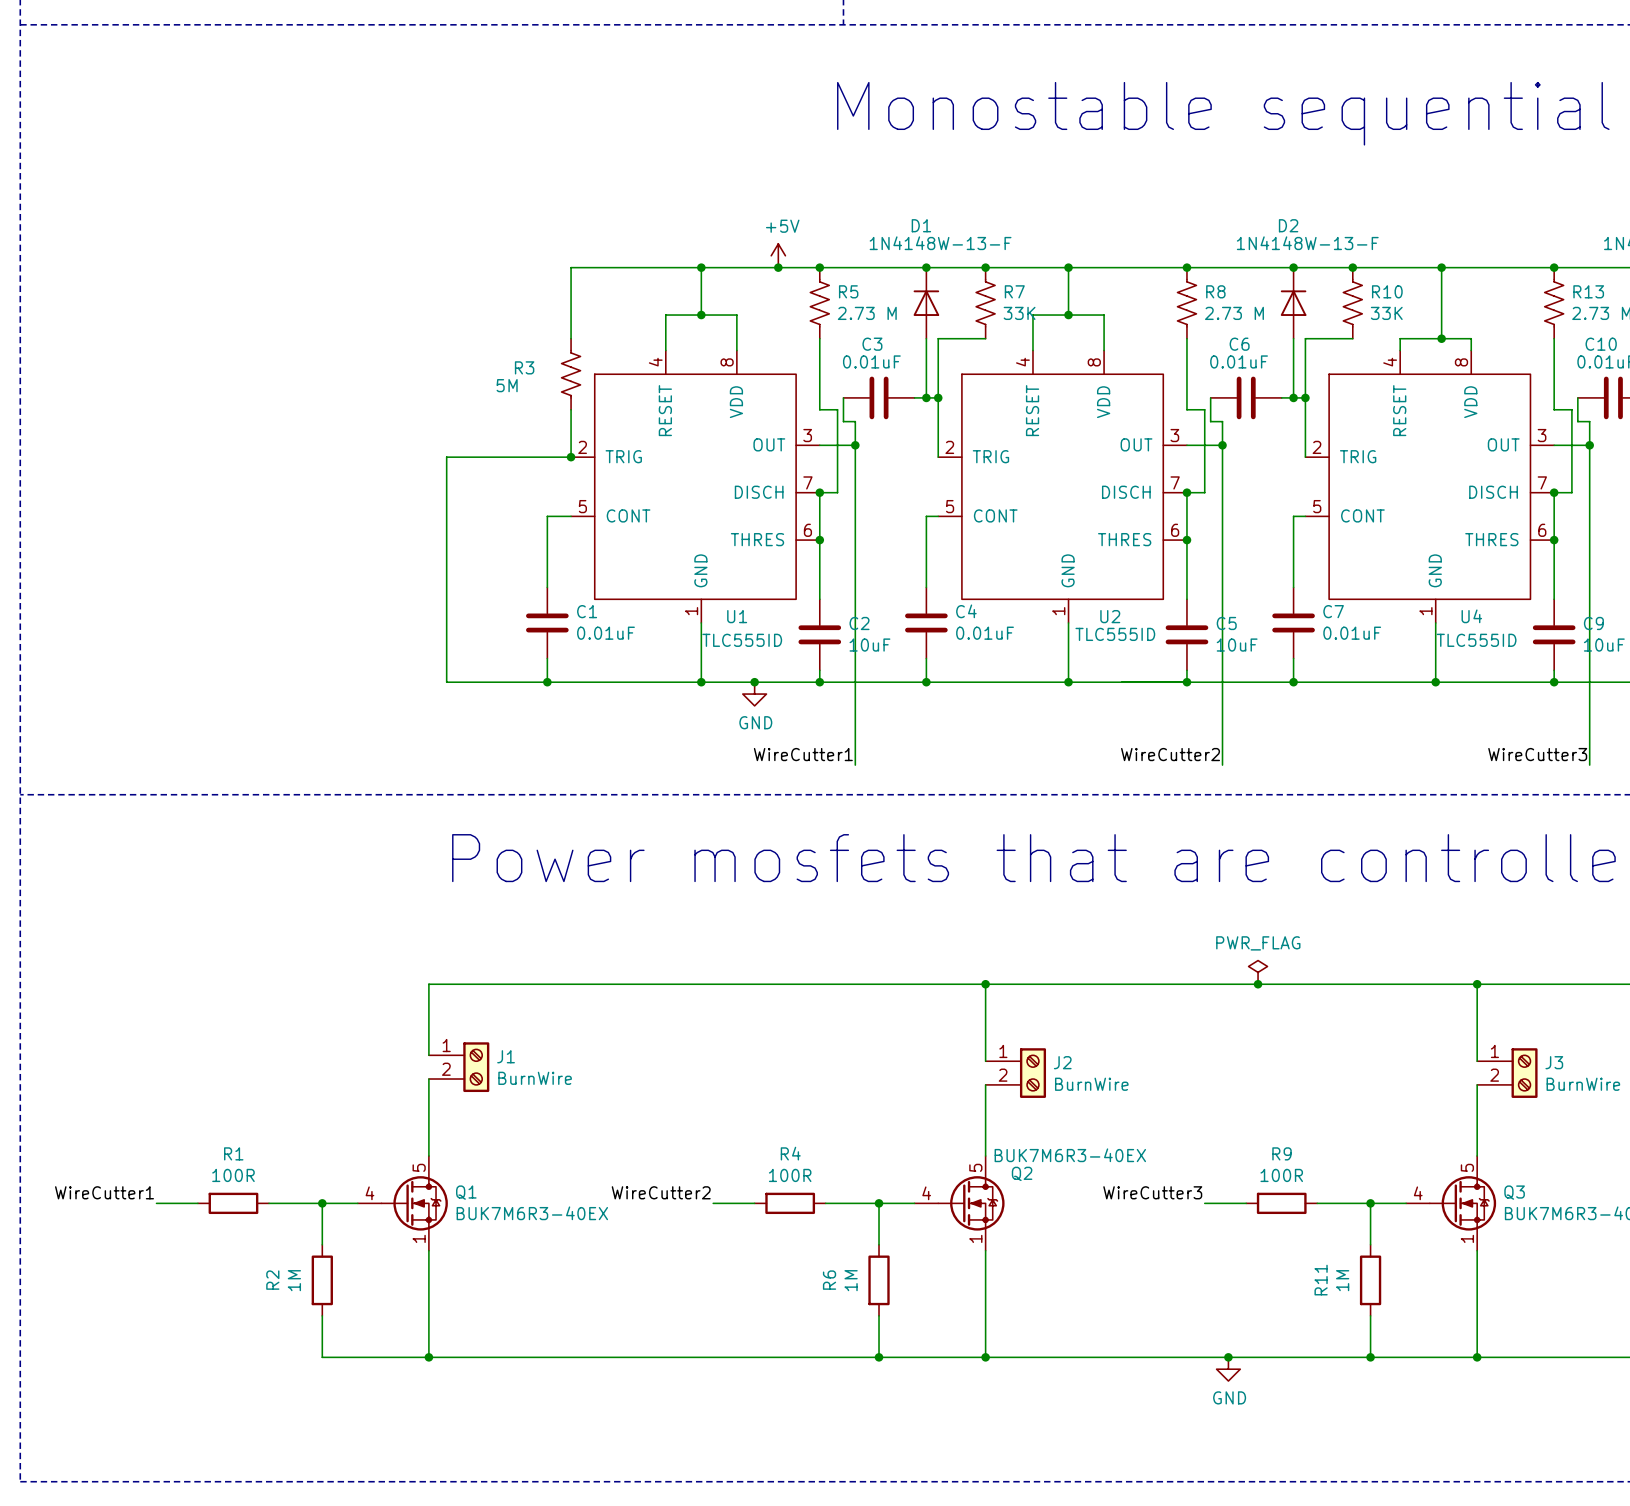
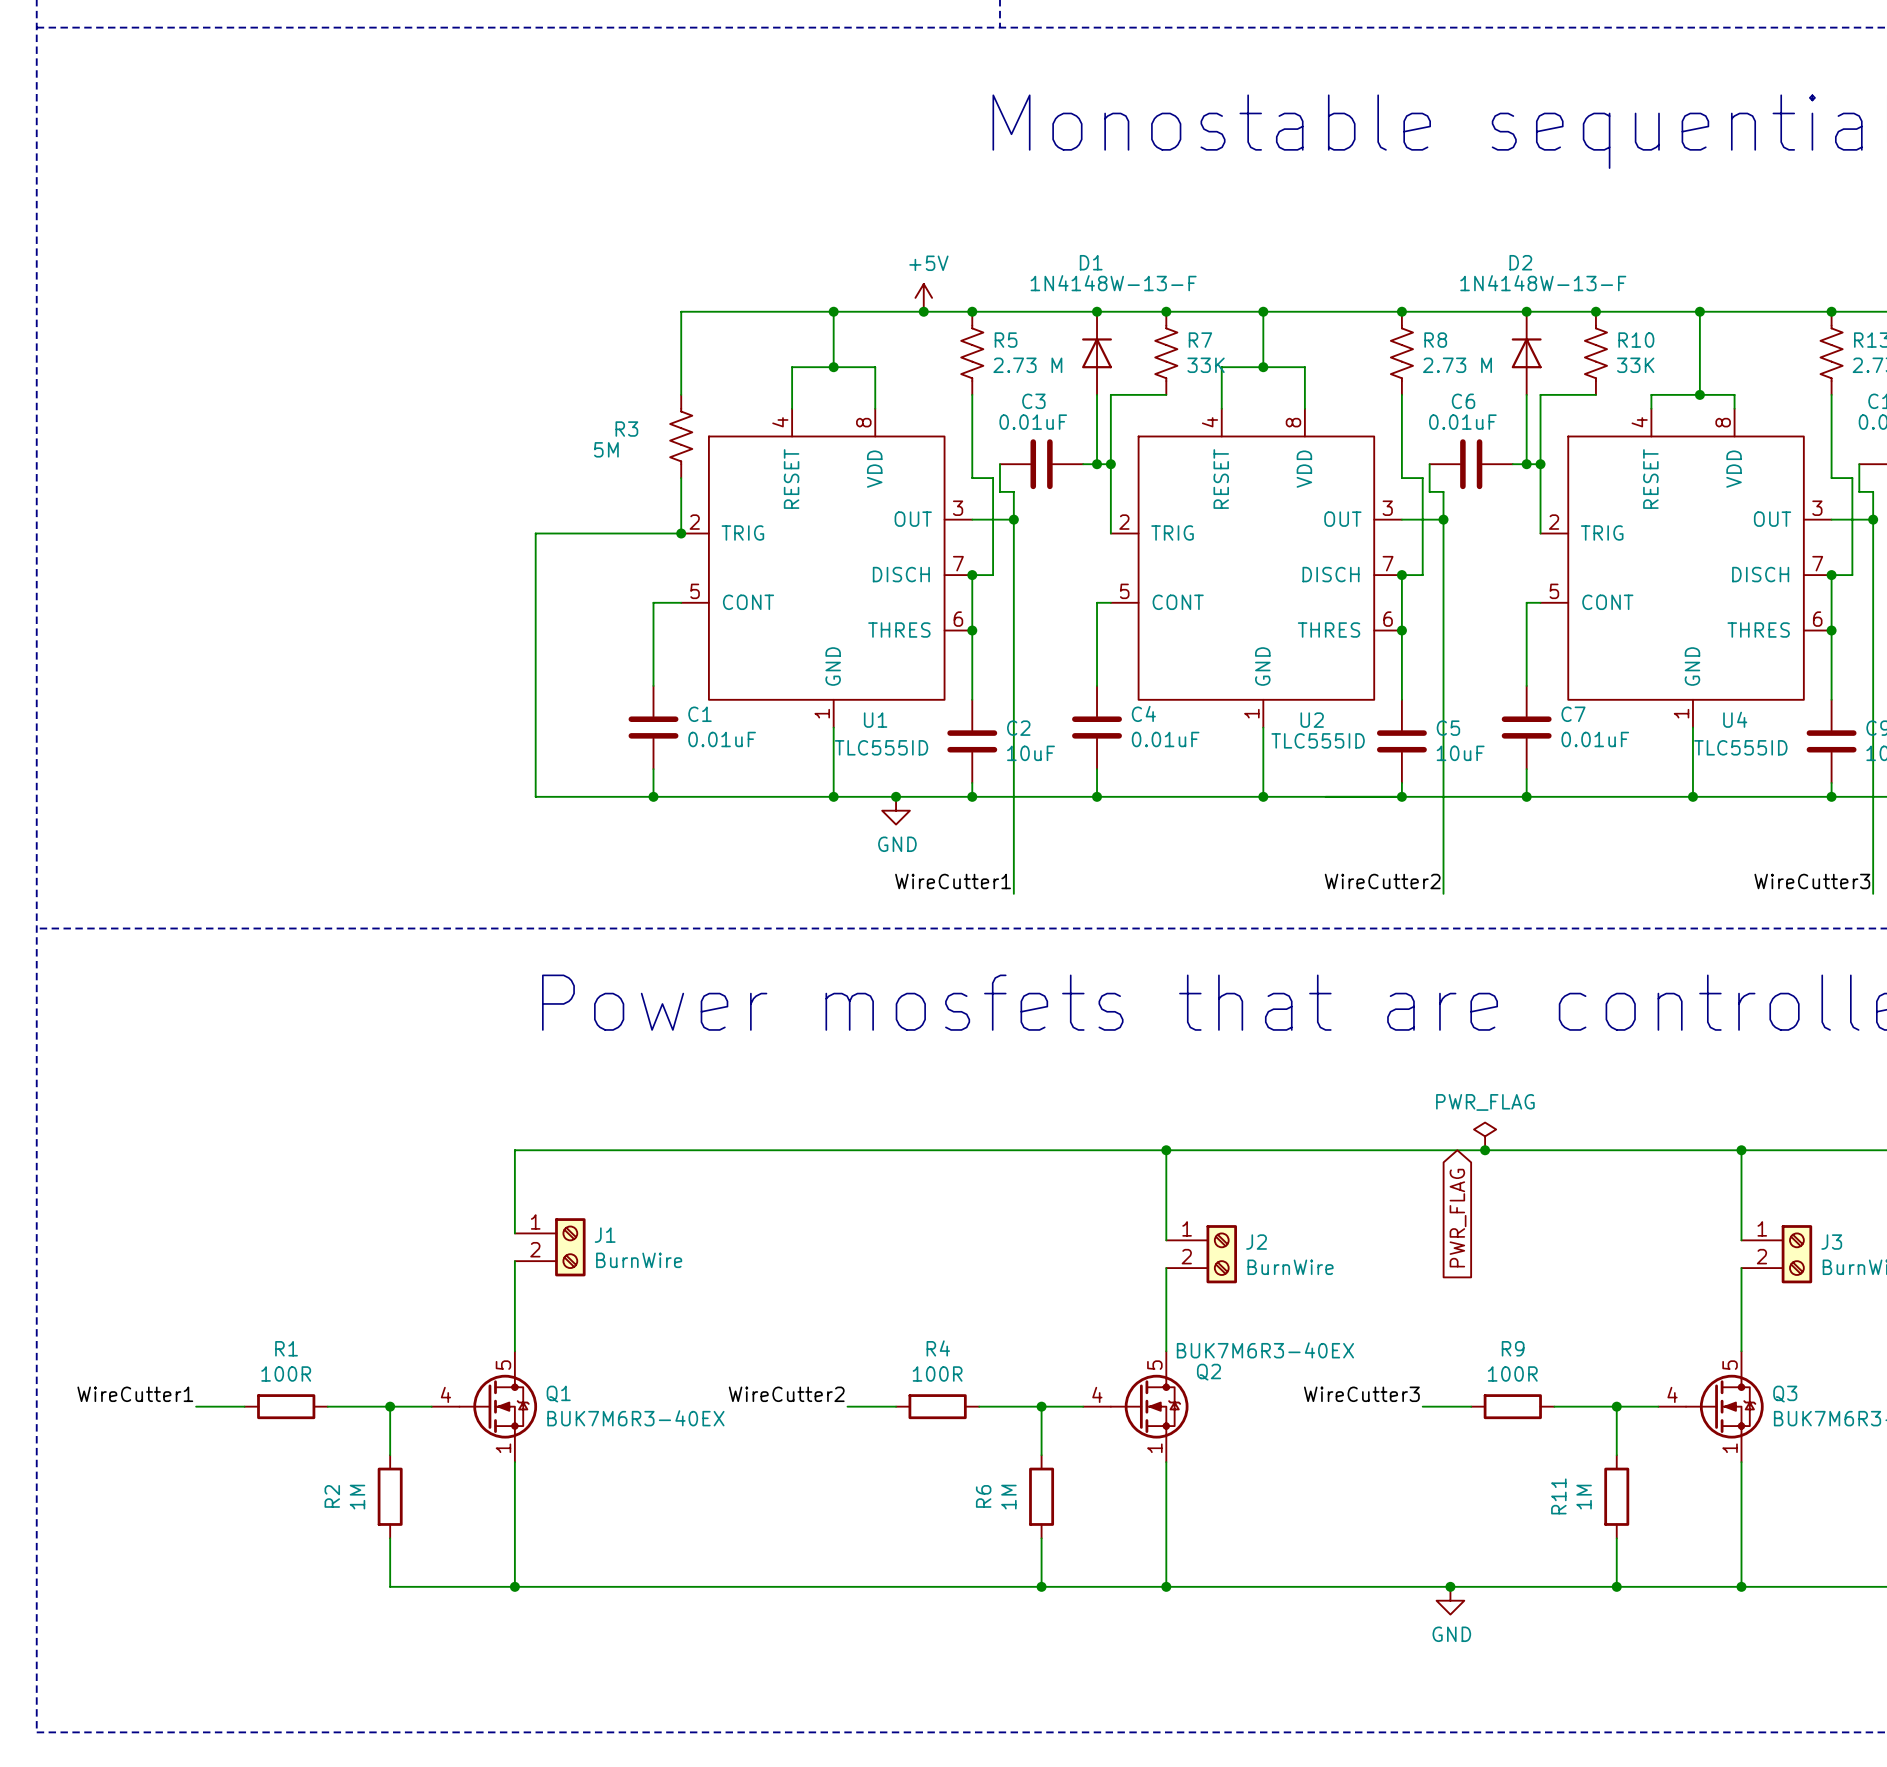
global label: none -> PWR_FLAG (1458, 1218)

